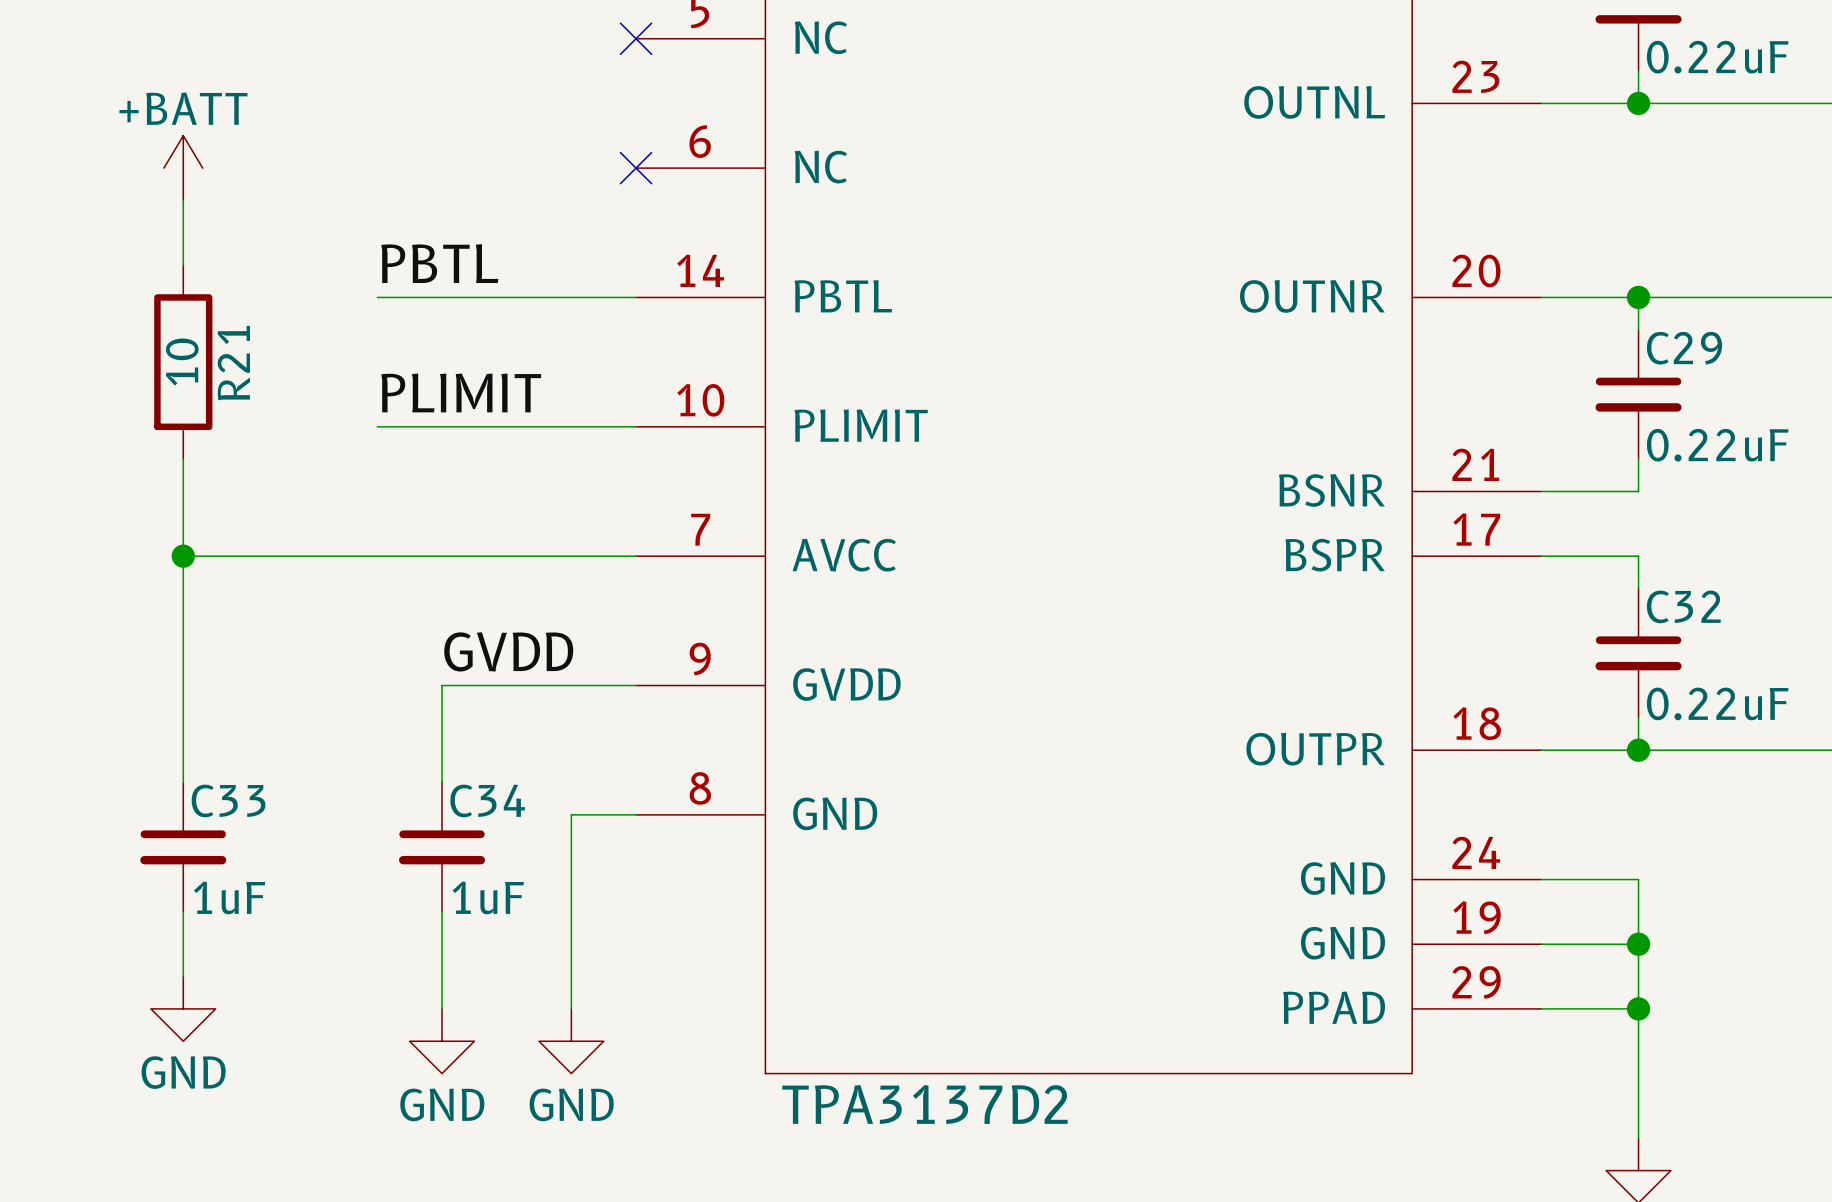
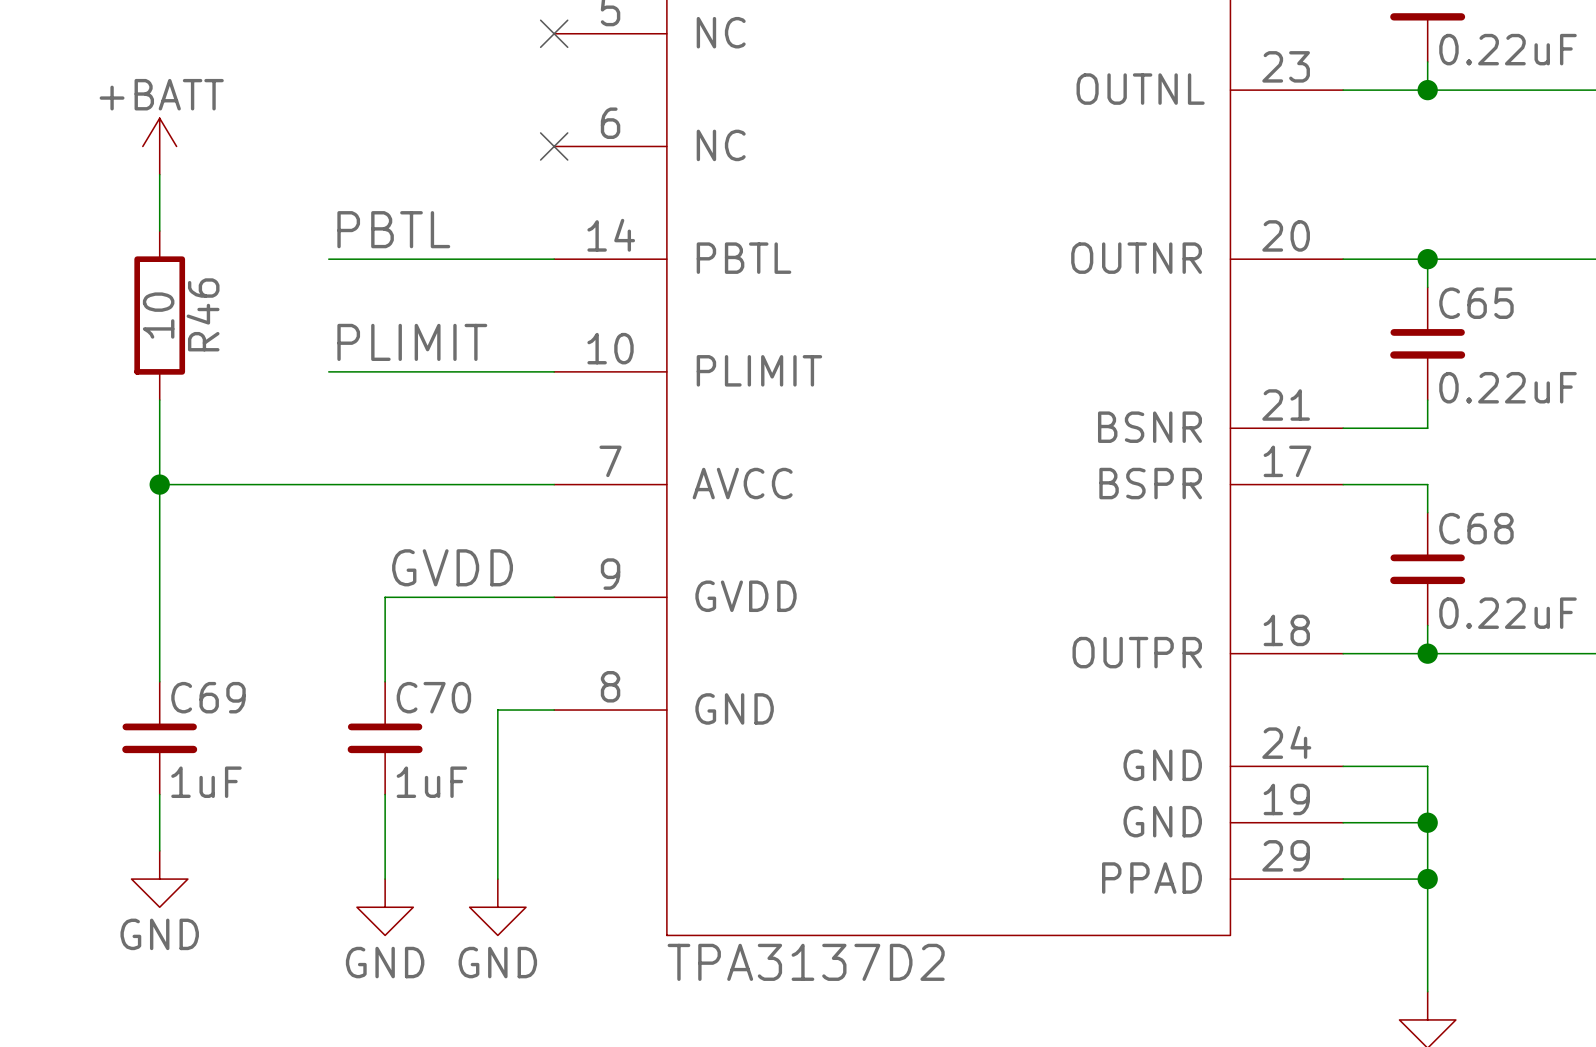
C29 name: C29 (1684, 348) -> C65 (1476, 303)
R21 name: R21 (233, 363) -> R46 (203, 314)
C32 name: C32 (1683, 606) -> C68 (1476, 528)
C33 name: C33 (228, 800) -> C69 (208, 697)
C34 name: C34 (487, 800) -> C70 (433, 697)

